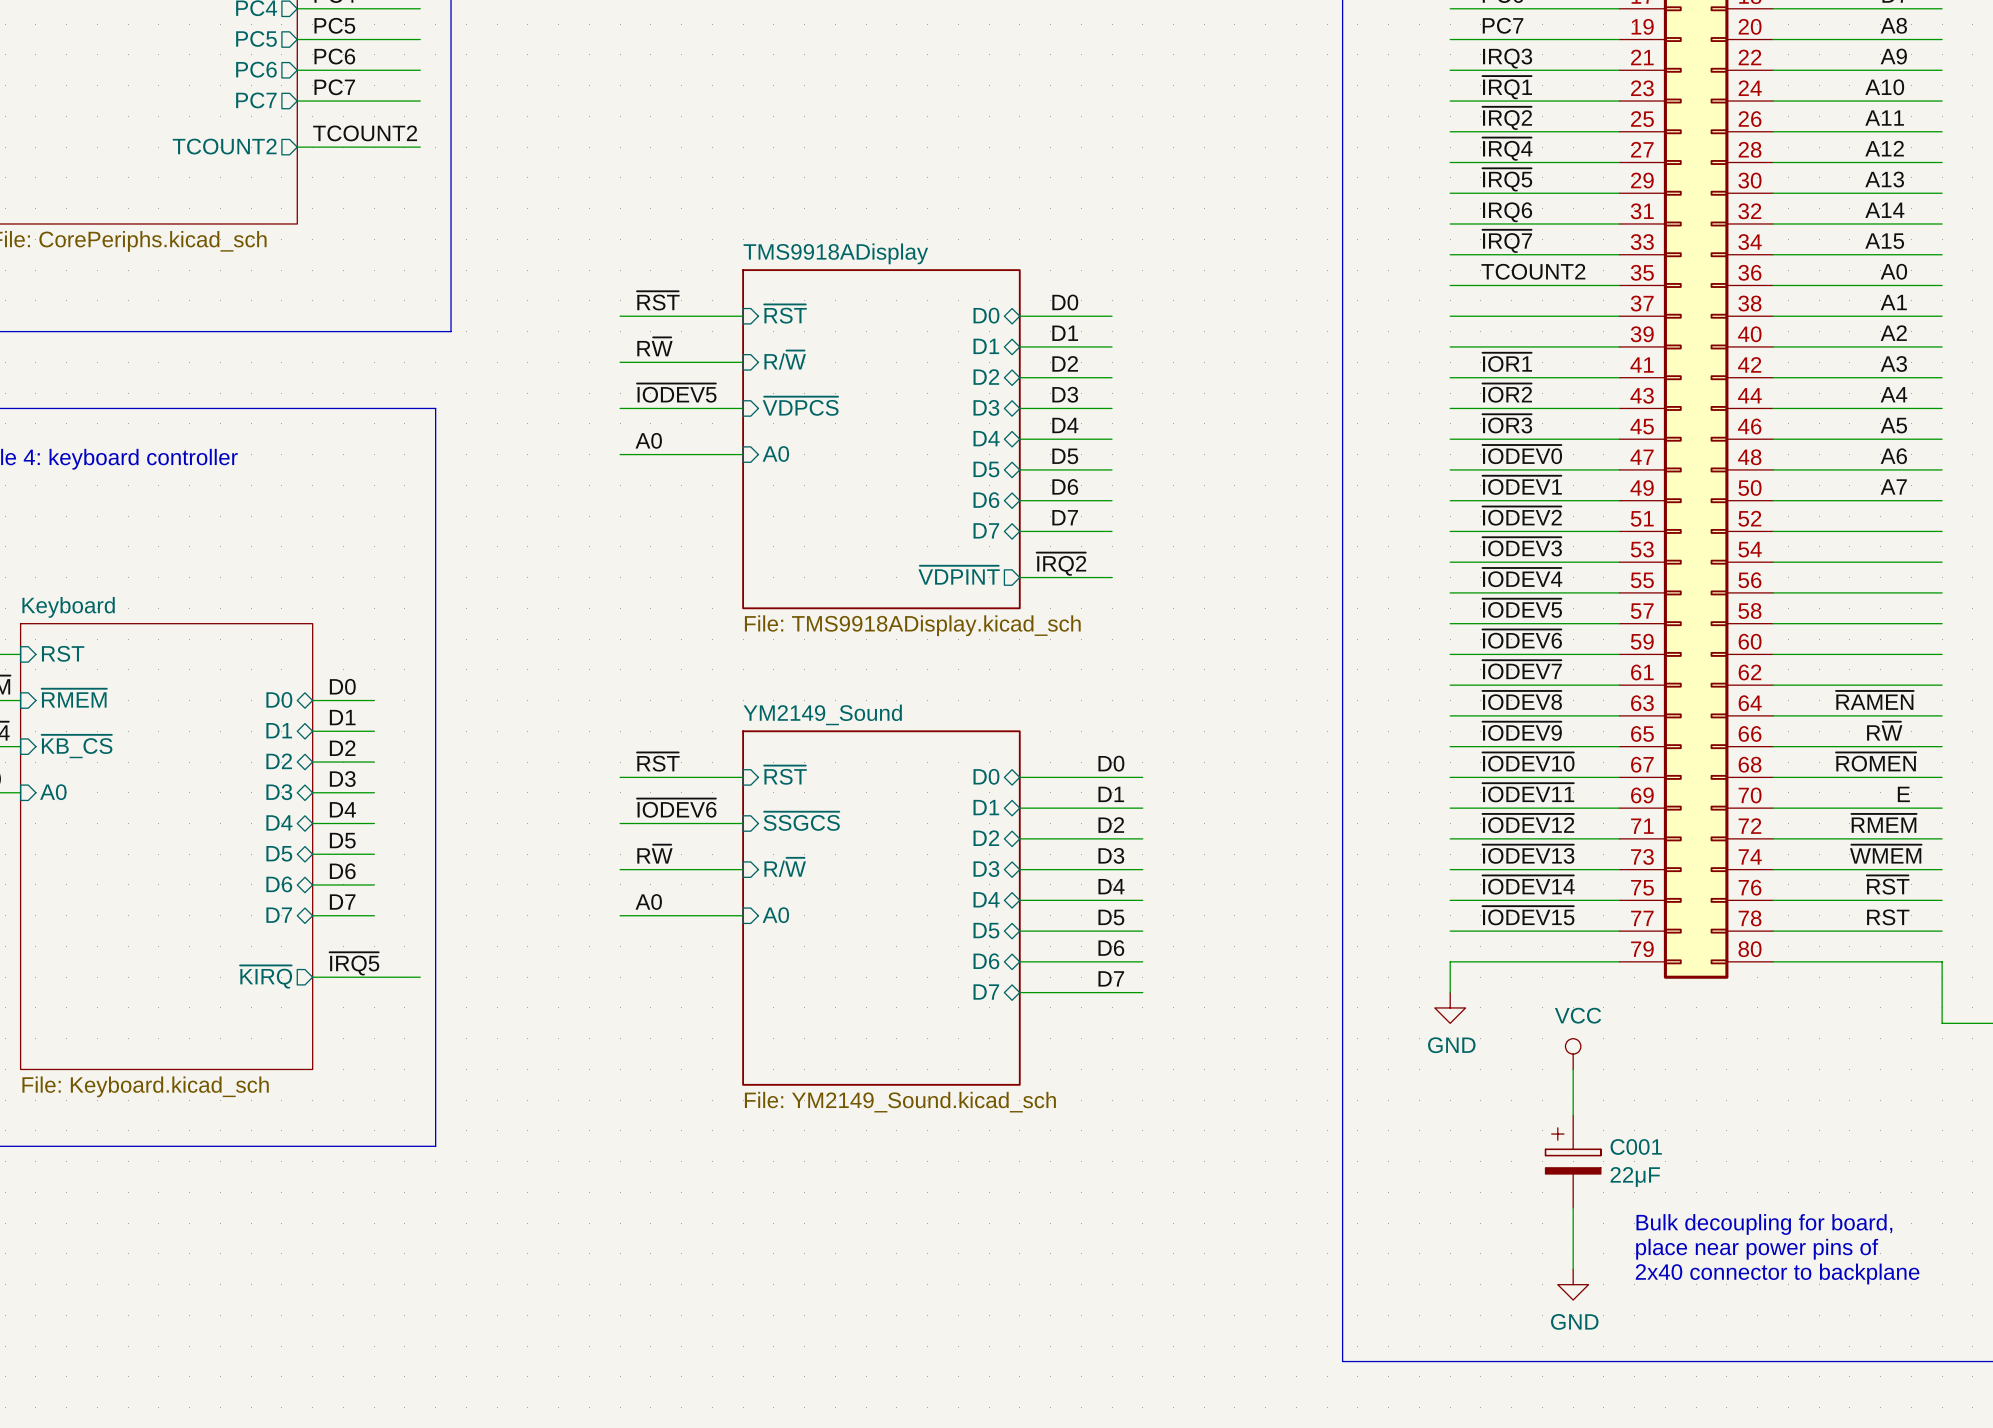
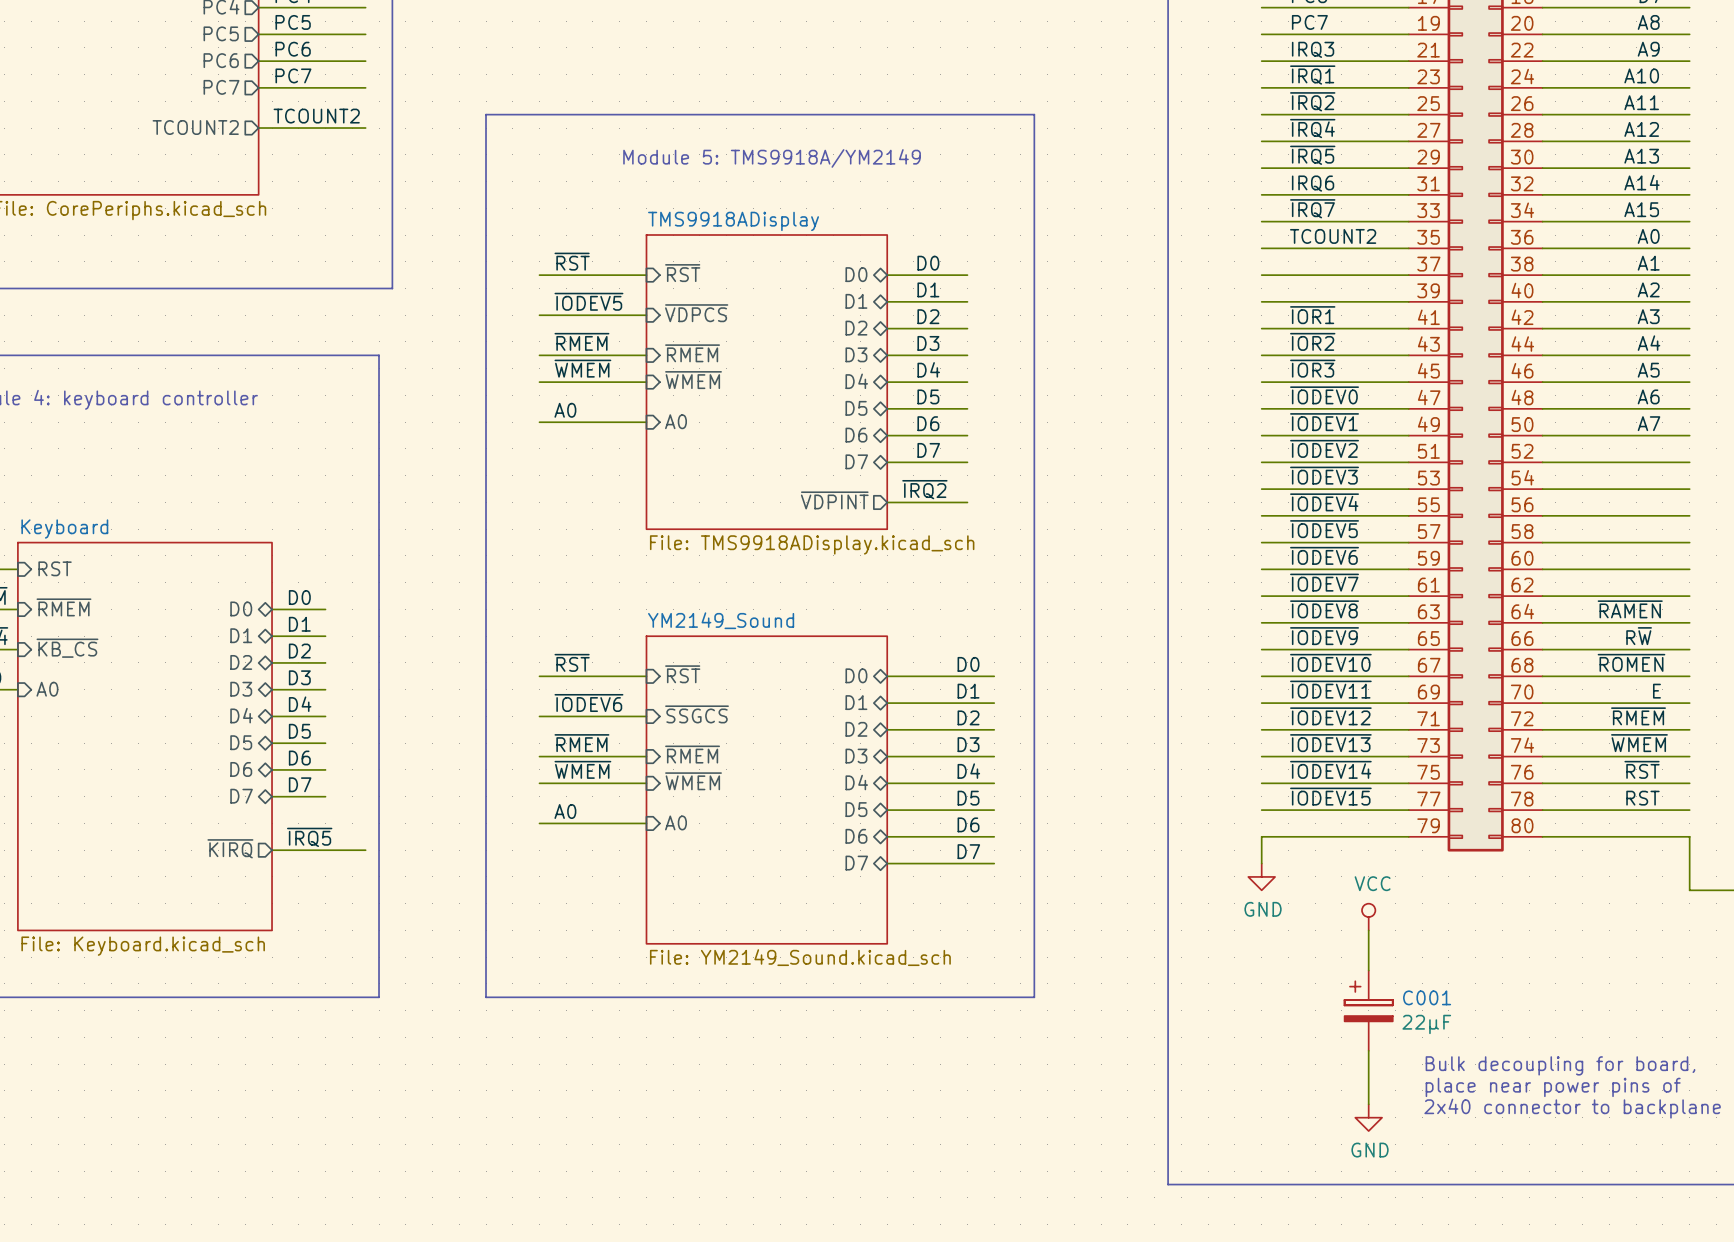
line: none -> (486, 114) (486, 997) (1034, 997) (1034, 114) (486, 114)
text: none -> Module 5: TMS9918A/YM2149 (772, 158)
label: R~{W} (654, 346) -> ~{IODEV5} (588, 301)
sheet pin: R/~{W} (785, 360) -> ~{VDPCS} (696, 313)
label: ~{IODEV5} (676, 393) -> ~{RMEM} (581, 341)
sheet pin: ~{VDPCS} (800, 406) -> ~{RMEM} (692, 353)
label: none -> ~{WMEM} (582, 368)
sheet pin: none -> ~{WMEM} (693, 380)
label position: A0 (648, 440) -> A0 (565, 410)
sheet pin position: A0 (775, 453) -> A0 (675, 421)
wire: (620, 454) (743, 454) -> (539, 382) (646, 382)
wire: none -> (539, 422) (646, 422)
label: R~{W} (654, 854) -> ~{RMEM} (581, 743)
sheet pin: R/~{W} (785, 867) -> ~{RMEM} (692, 754)
label: none -> ~{WMEM} (582, 769)
sheet pin: none -> ~{WMEM} (693, 781)
label position: A0 (648, 902) -> A0 (565, 811)
wire: (620, 915) (743, 915) -> (539, 783) (646, 783)
sheet pin position: A0 (775, 915) -> A0 (675, 822)
wire: none -> (539, 823) (646, 823)

